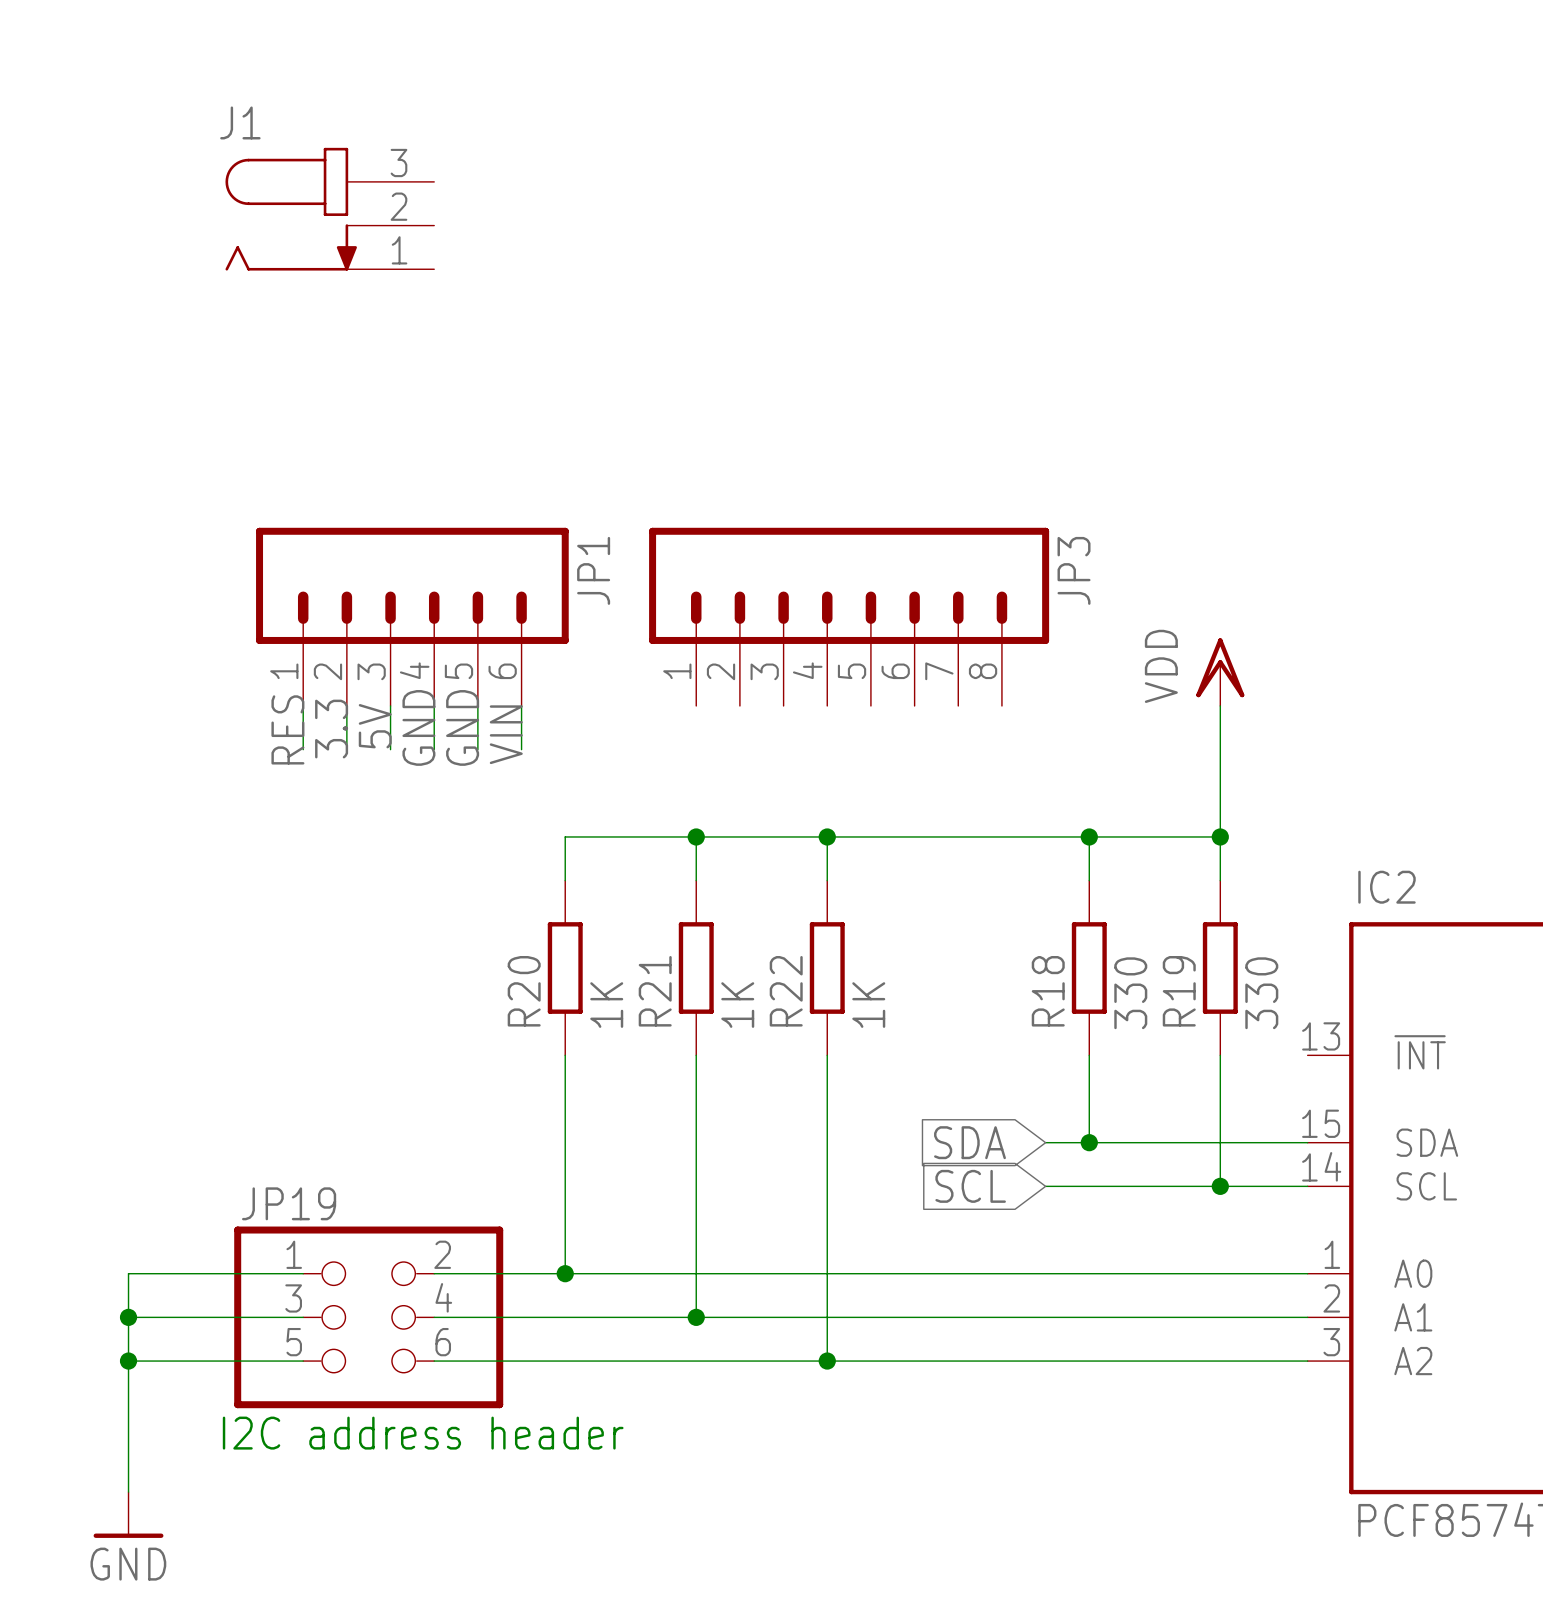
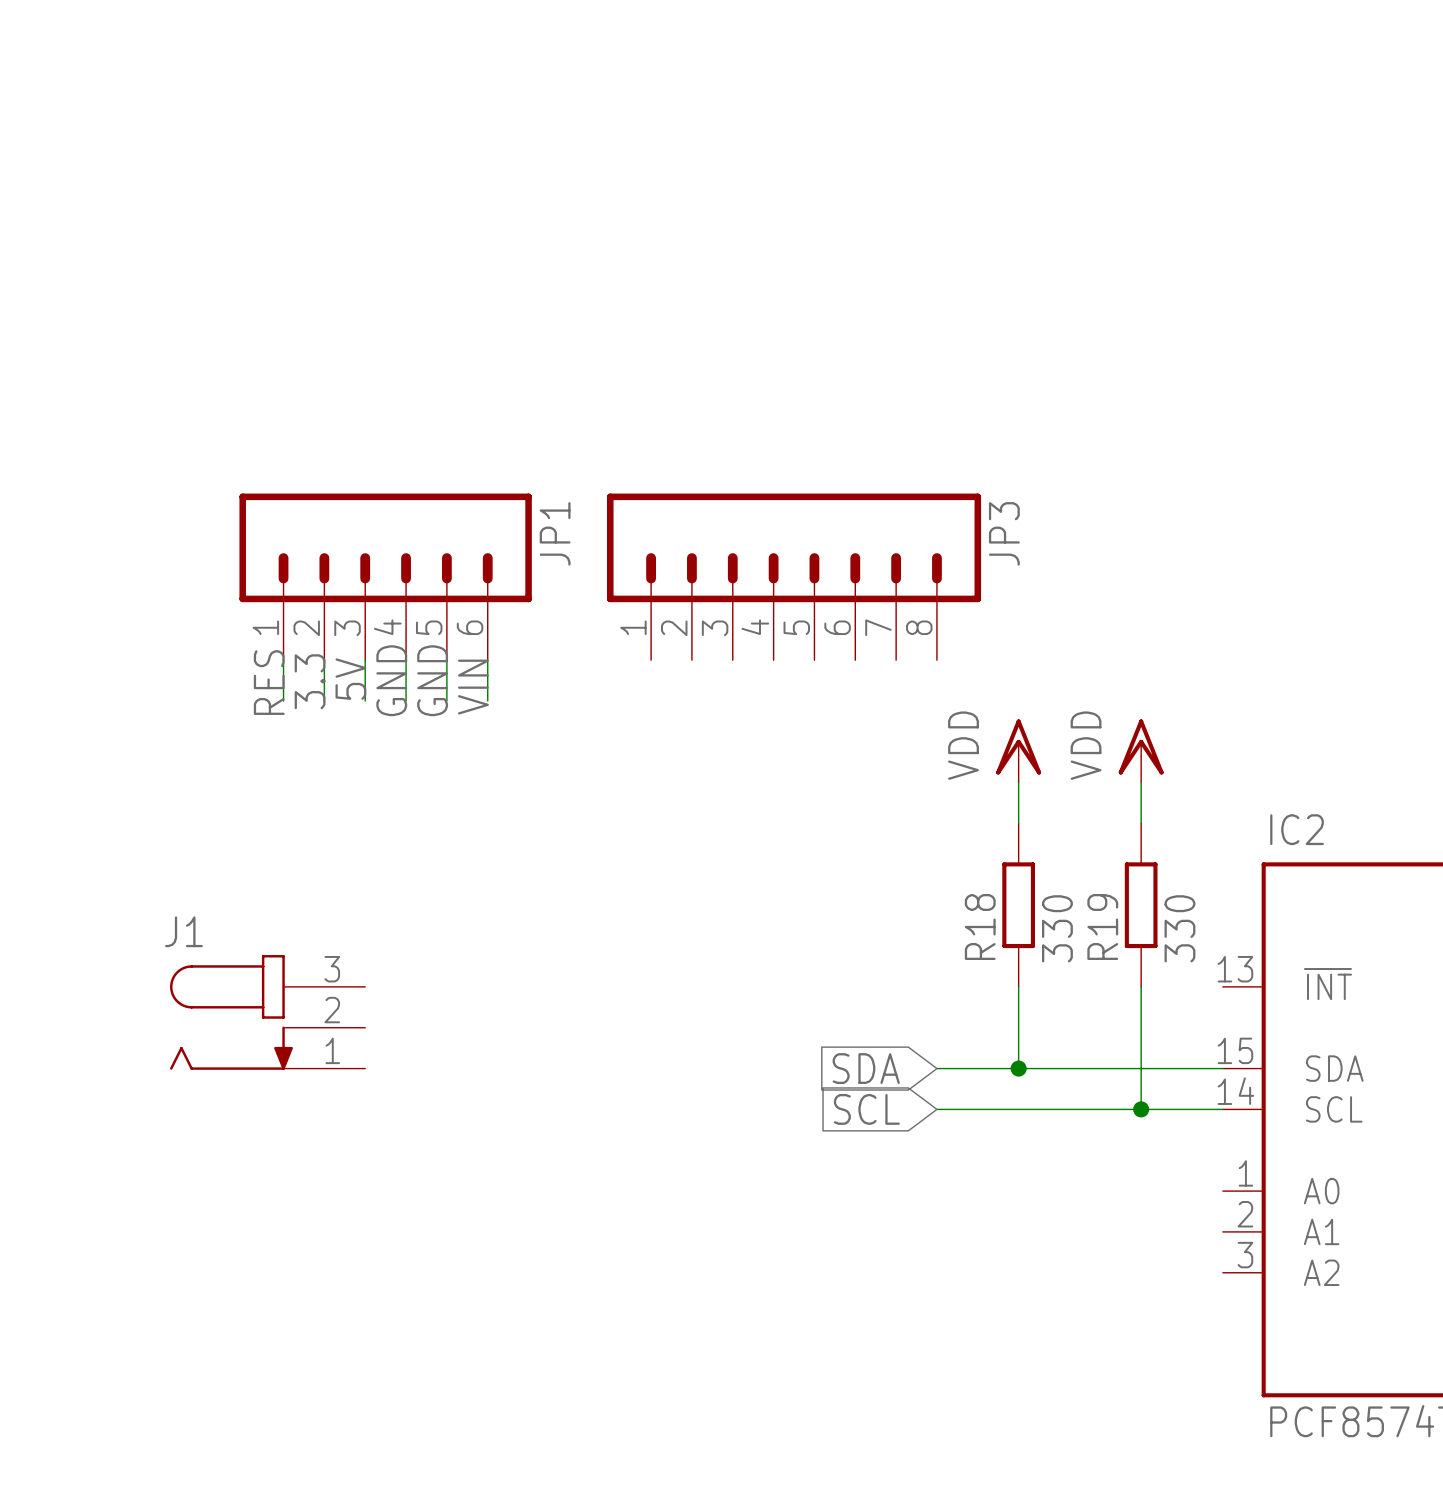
J1 position: (329, 209) -> (267, 1012)
power symbol: VDD (1220, 672) -> none
wire: (1220, 705) (1220, 836) (565, 836) (565, 880) -> none
power symbol: none -> VDD (1018, 751)
power symbol: none -> VDD (1141, 751)
wire: (696, 836) (696, 880) -> none
junction: (696, 836) -> none
wire: (827, 836) (827, 880) -> none
junction: (827, 836) -> none
junction: (1089, 836) -> none
junction: (1220, 836) -> none
R20: 1K (565, 968) -> none
R21: 1K (696, 968) -> none
R22: 1K (827, 968) -> none
wire: (565, 1055) (565, 1273) -> none
wire: (696, 1055) (696, 1317) -> none
wire: (827, 1055) (827, 1361) -> none
global label position: SDA (969, 1142) -> SDA (866, 1068)
wire: none -> (936, 1068) (977, 1068)
global label position: SCL (970, 1186) -> SCL (866, 1109)
wire: none -> (936, 1109) (977, 1109)
wire: (303, 1273) (128, 1273) (128, 1492) -> none
wire: (434, 1273) (1307, 1273) -> none
junction: (565, 1273) -> none
wire: (128, 1317) (303, 1317) -> none
junction: (128, 1317) -> none
JP19: (368, 1317) -> none
wire: (434, 1317) (1307, 1317) -> none
junction: (696, 1317) -> none
wire: (128, 1361) (303, 1361) -> none
junction: (128, 1361) -> none
wire: (434, 1361) (1307, 1361) -> none
junction: (827, 1361) -> none
text: I2C address header (423, 1433) -> none
power symbol: GND (128, 1514) -> none

